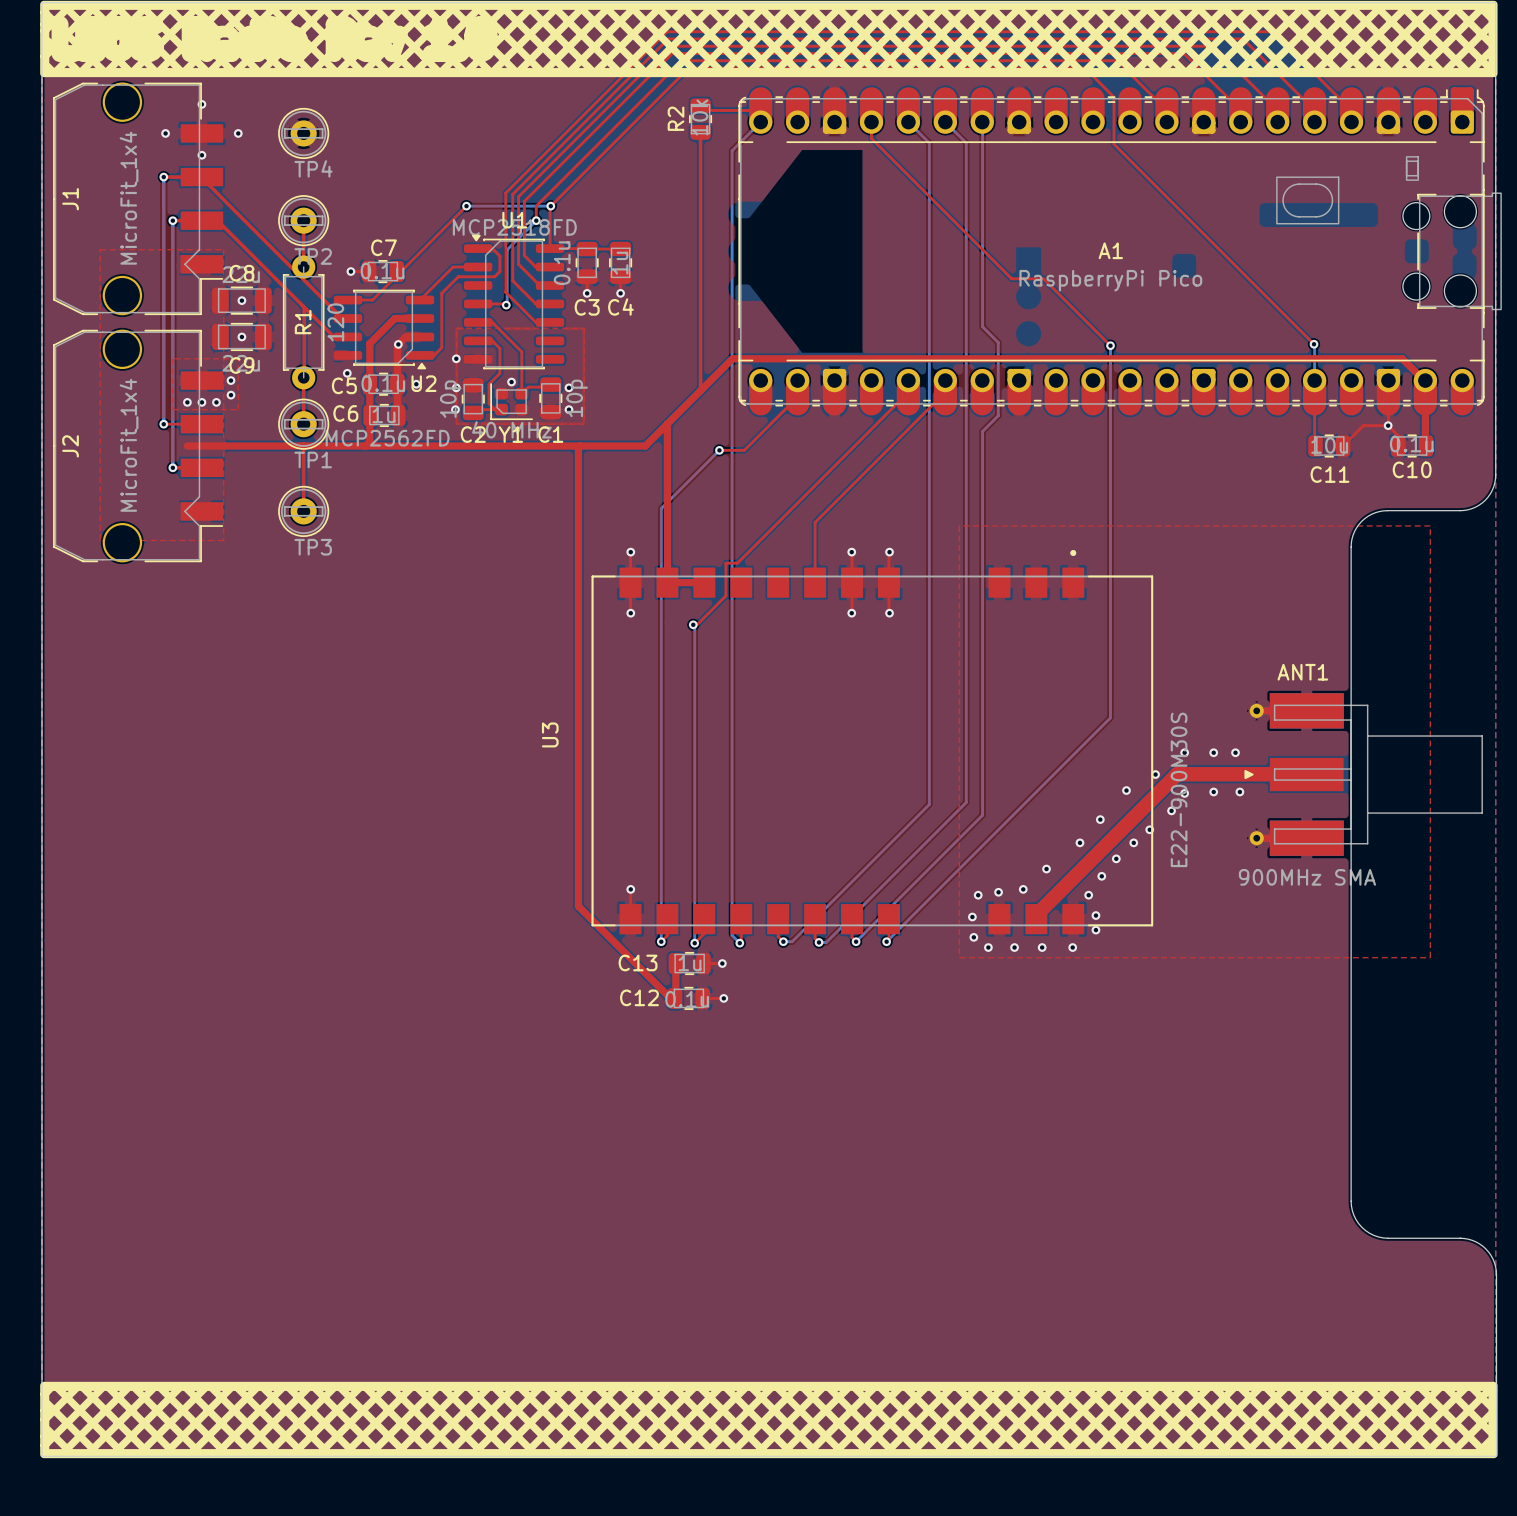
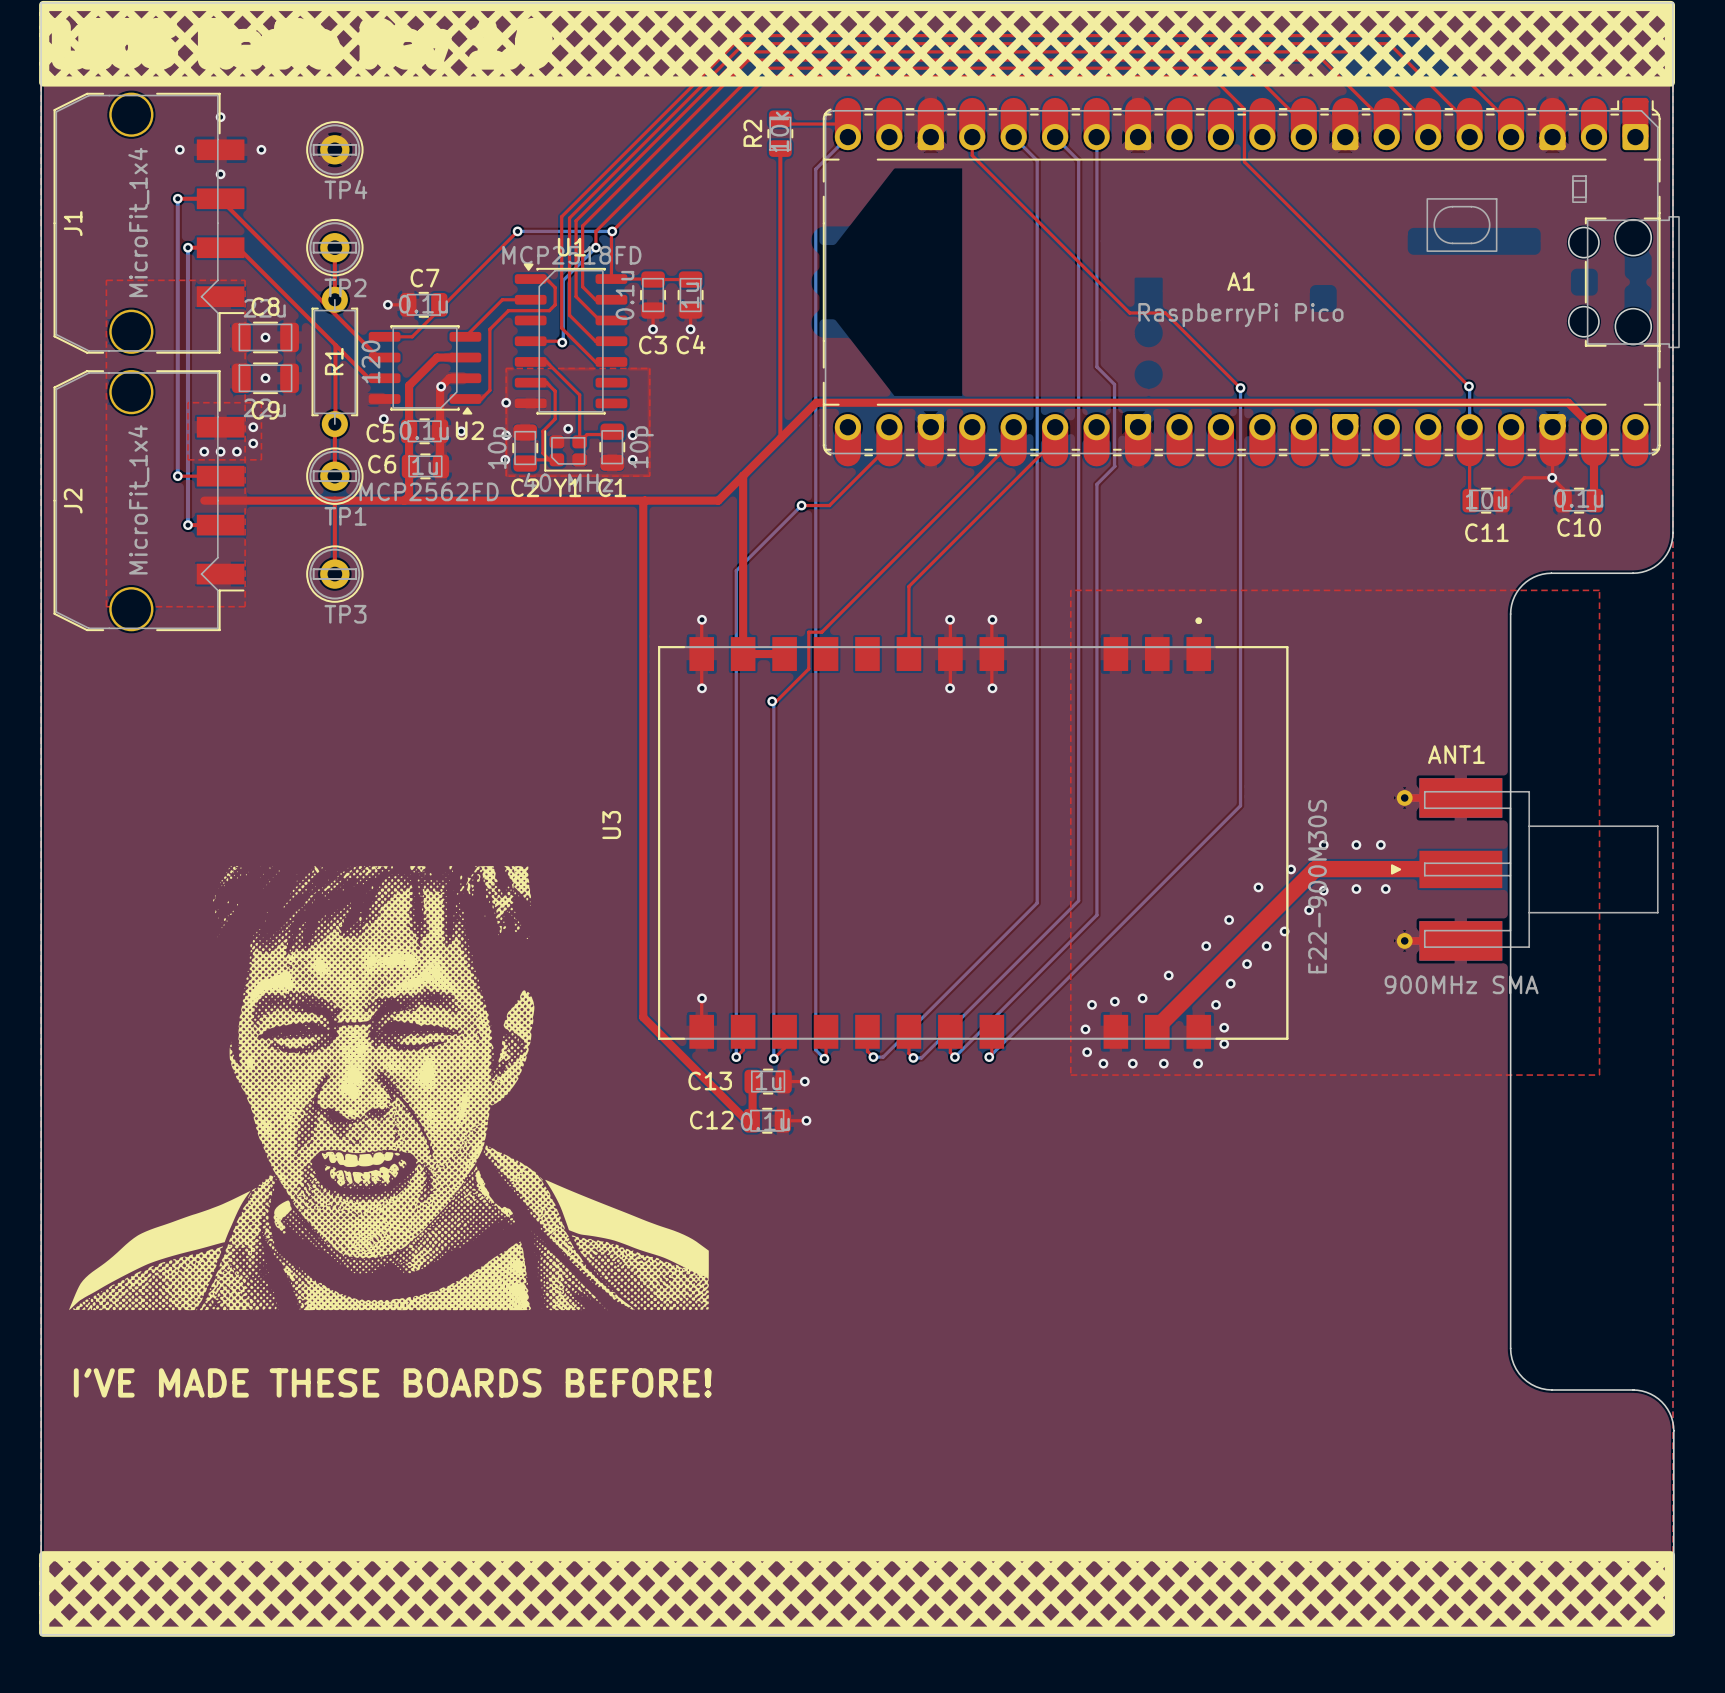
drawing: none -> [69, 866, 709, 1311]
text: none -> I'VE MADE THESE BOARDS BEFORE! (392, 1382)

